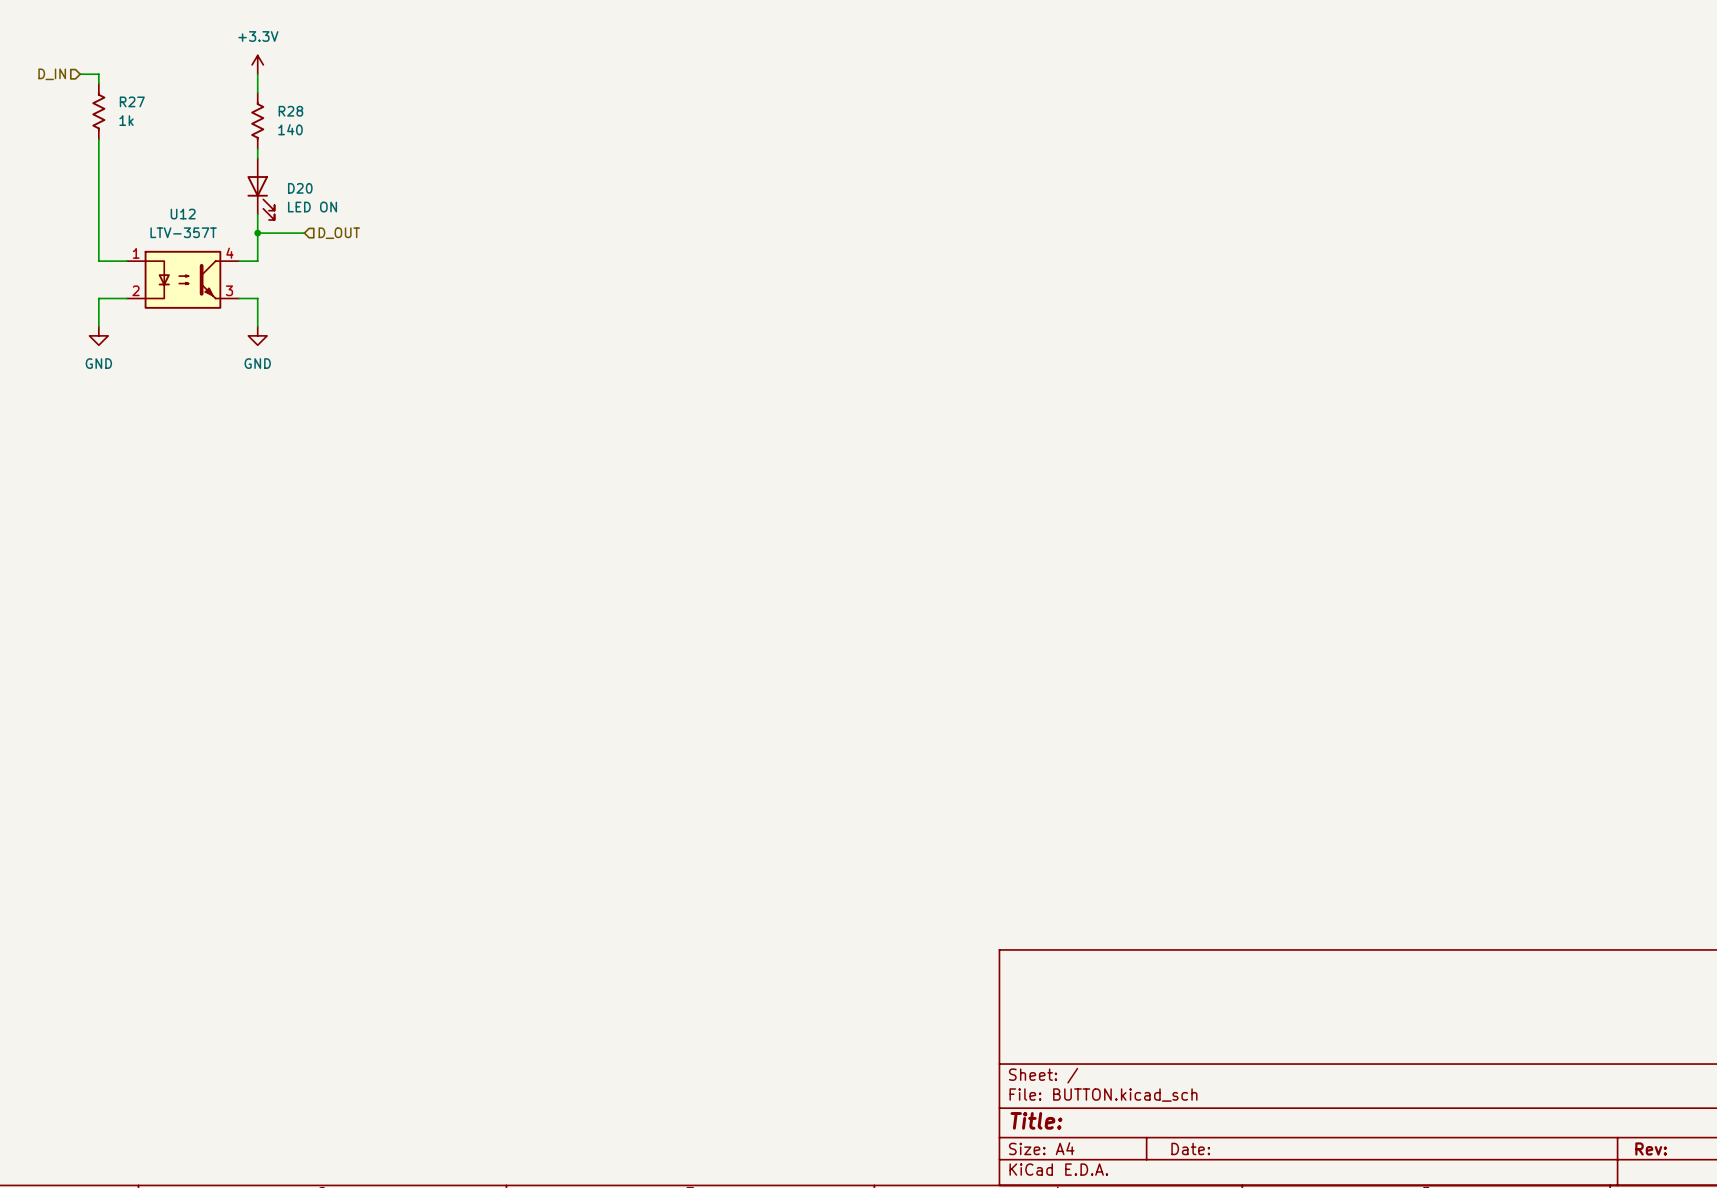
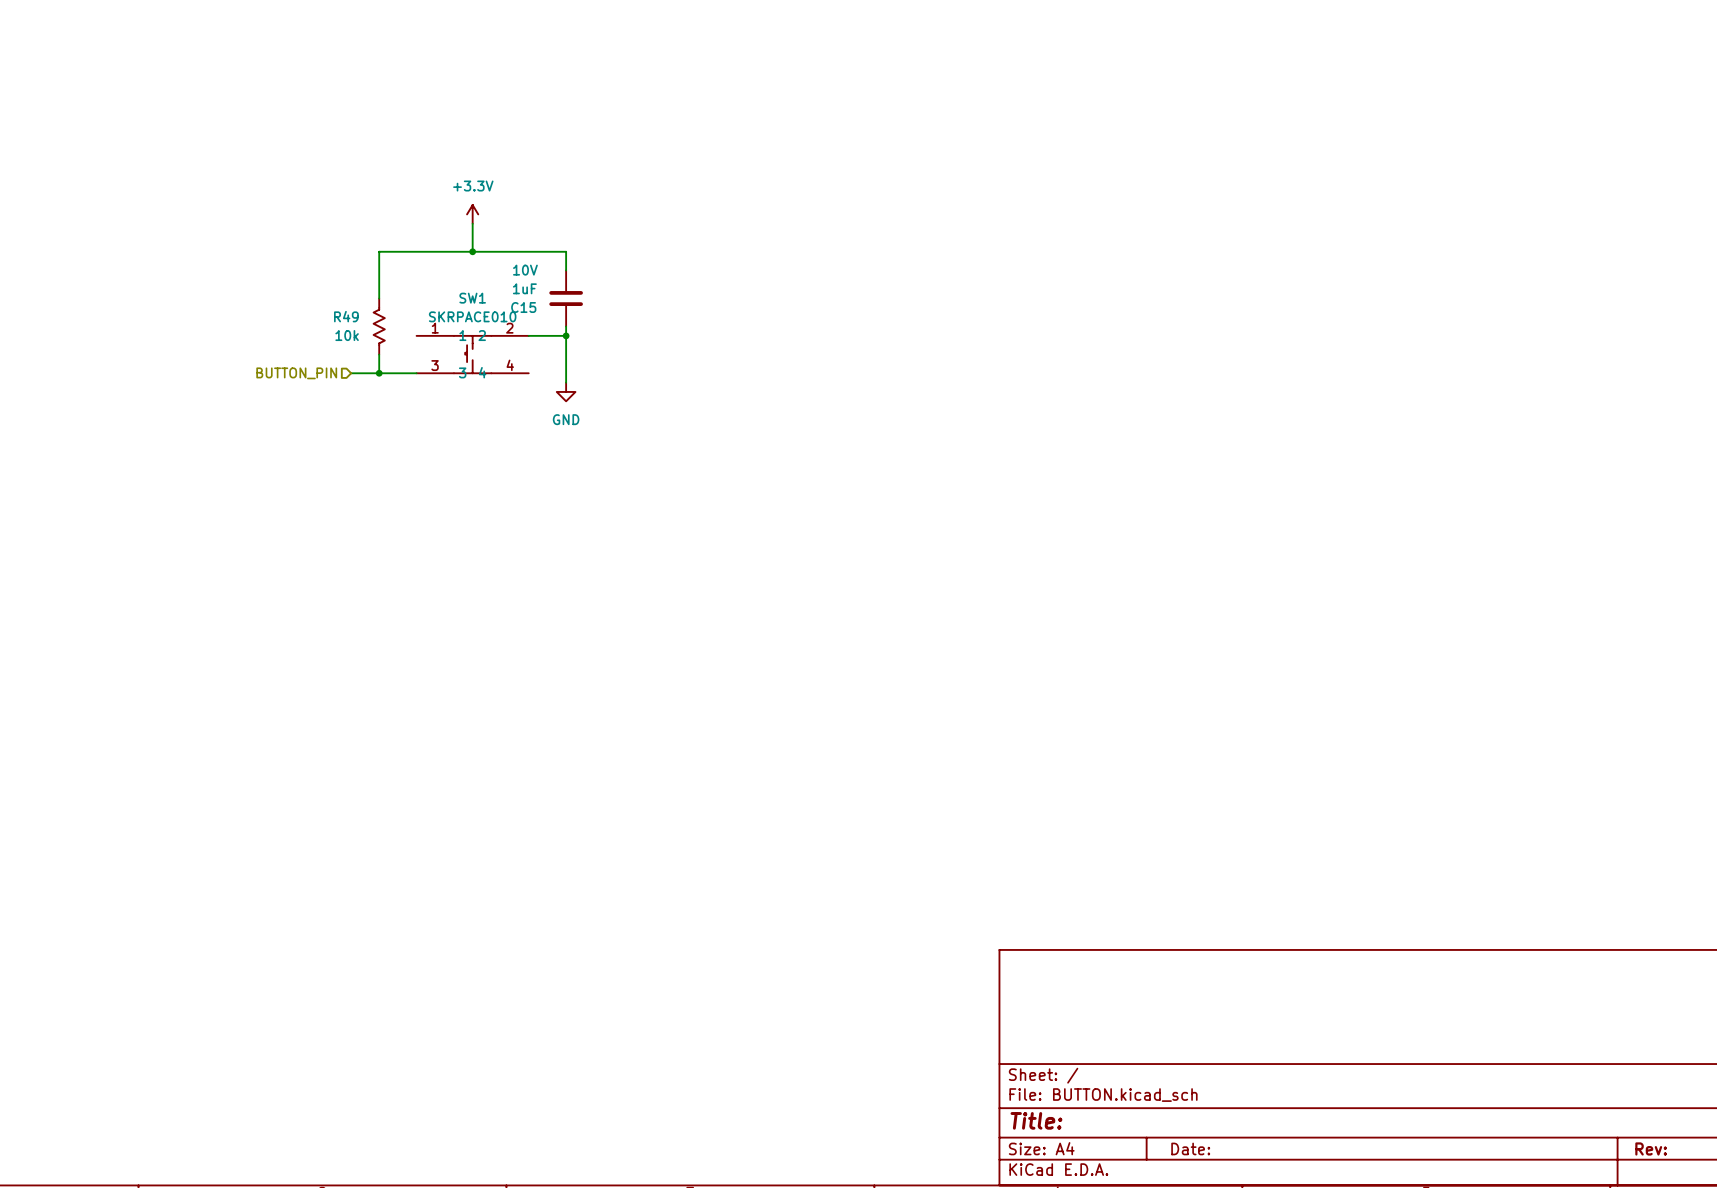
power symbol: +3.3V (257, 64) -> none
hierarchical label: D_IN (52, 74) -> none
wire: (80, 74) (98, 74) (98, 83) -> none
wire: (257, 74) (257, 92) -> none
R27: 1k (98, 111) -> none
R28: 140 (257, 120) -> none
wire: (98, 139) (98, 261) (126, 261) -> none
wire: (257, 148) (257, 158) -> none
D20: LED ON (260, 189) -> none
wire: (257, 214) (257, 261) (239, 261) -> none
power symbol: none -> +3.3V (472, 214)
wire: none -> (472, 223) (472, 251)
wire: (257, 233) (304, 233) -> none
junction: (257, 233) -> none
hierarchical label: D_OUT (339, 233) -> none
junction: none -> (472, 251)
wire: none -> (566, 270) (566, 251) (379, 251) (379, 298)
U12: LTV-357T (182, 279) -> none
wire: (126, 298) (98, 298) (98, 326) -> none
wire: (239, 298) (257, 298) (257, 326) -> none
C15: none -> 1uF (566, 298)
R49: none -> 10k (379, 326)
wire: none -> (566, 326) (566, 382)
power symbol: GND (98, 335) -> none
power symbol: GND (257, 335) -> none
wire: none -> (528, 335) (566, 335)
junction: none -> (566, 335)
wire: none -> (379, 354) (379, 373)
SW1: none -> SKRPACE010 (472, 354)
hierarchical label: none -> BUTTON_PIN (296, 373)
wire: none -> (351, 373) (416, 373)
junction: none -> (379, 373)
power symbol: none -> GND (566, 391)

